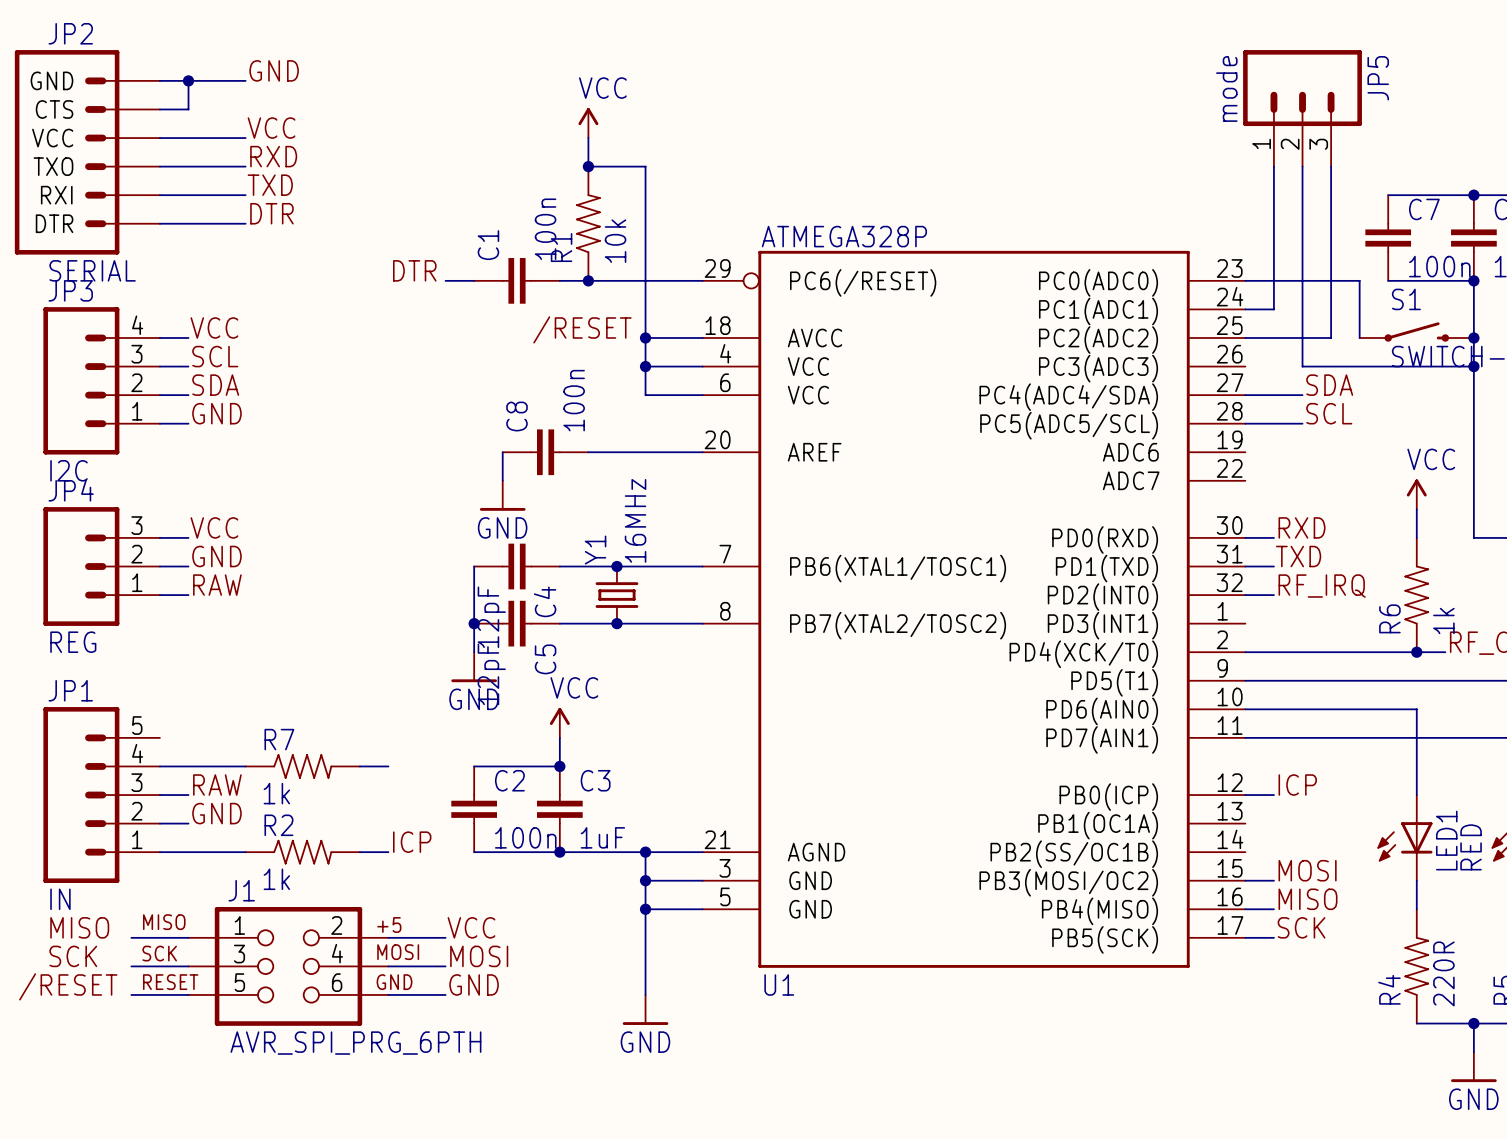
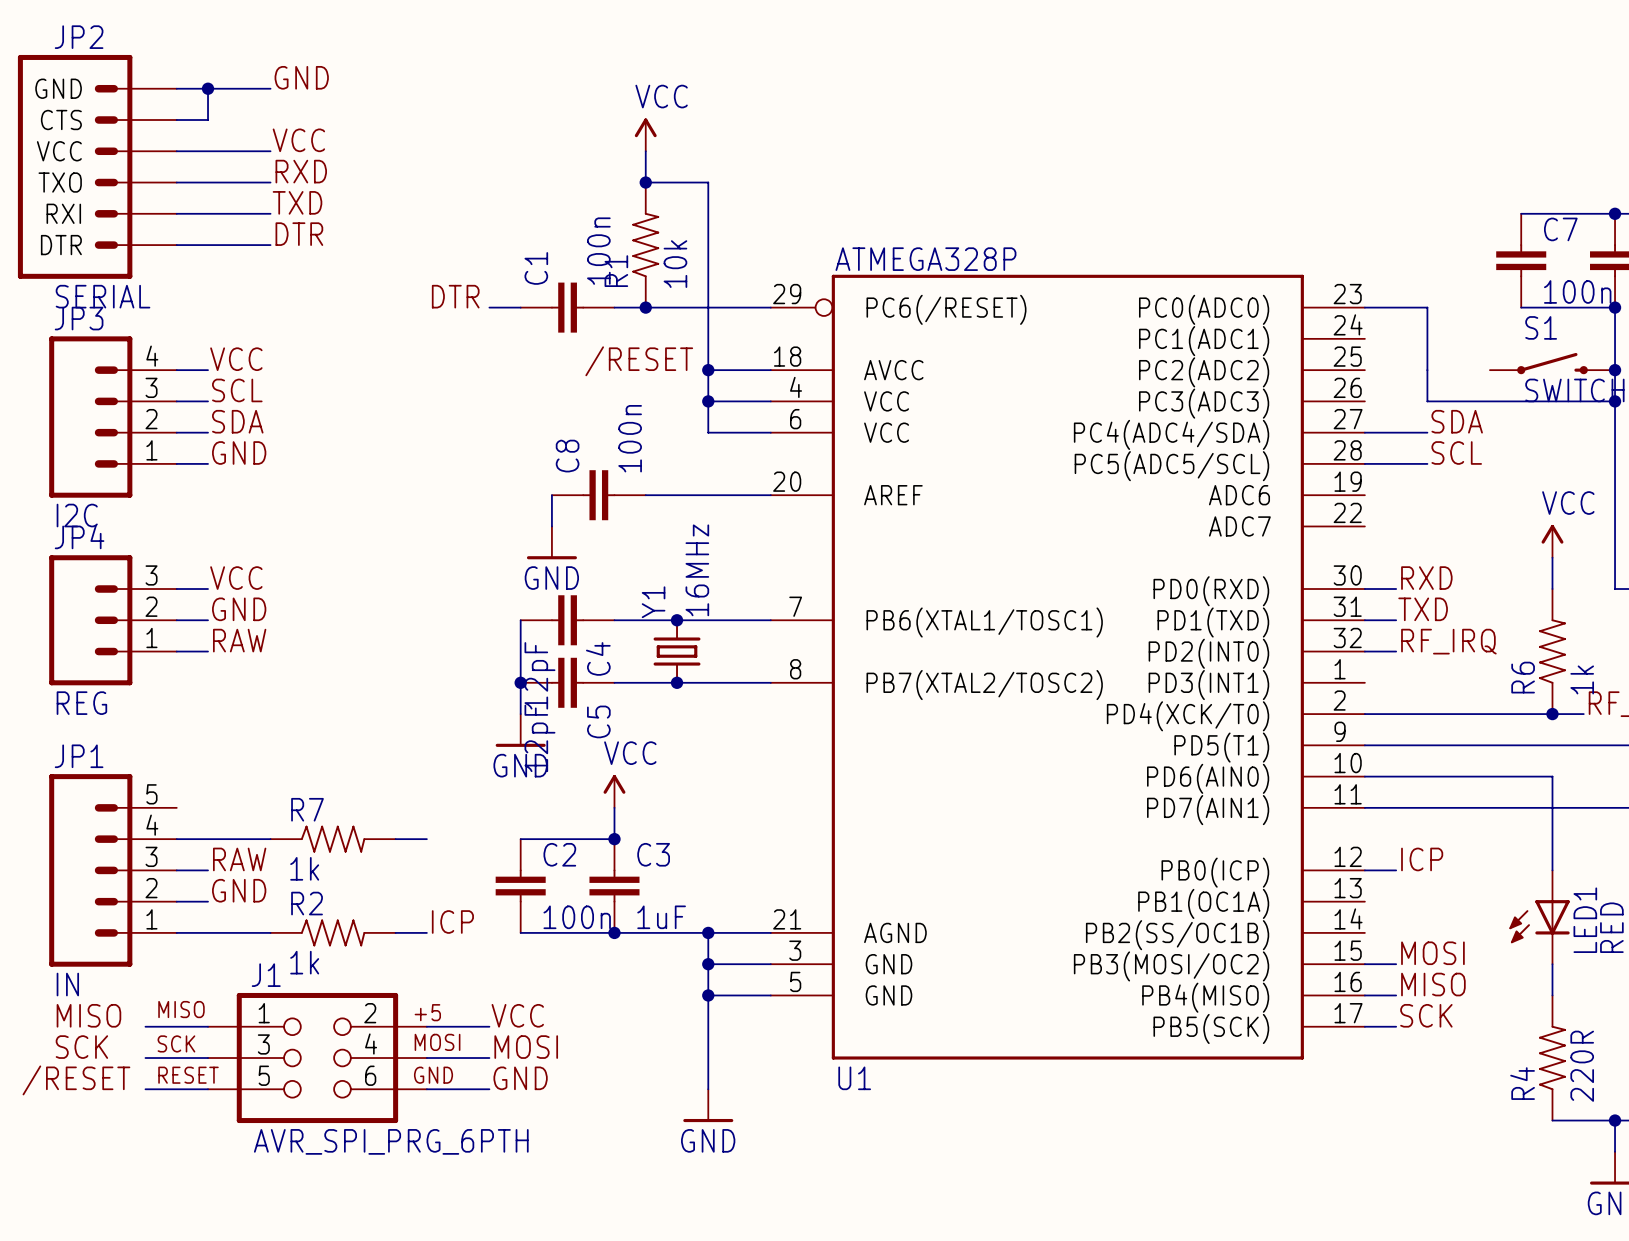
JP5: mode (1302, 108) -> none
wire: (1273, 166) (1273, 309) (1245, 309) -> none
wire: (1302, 166) (1302, 280) (1359, 280) (1359, 337) -> none
wire: (1331, 166) (1331, 337) (1245, 337) -> none

